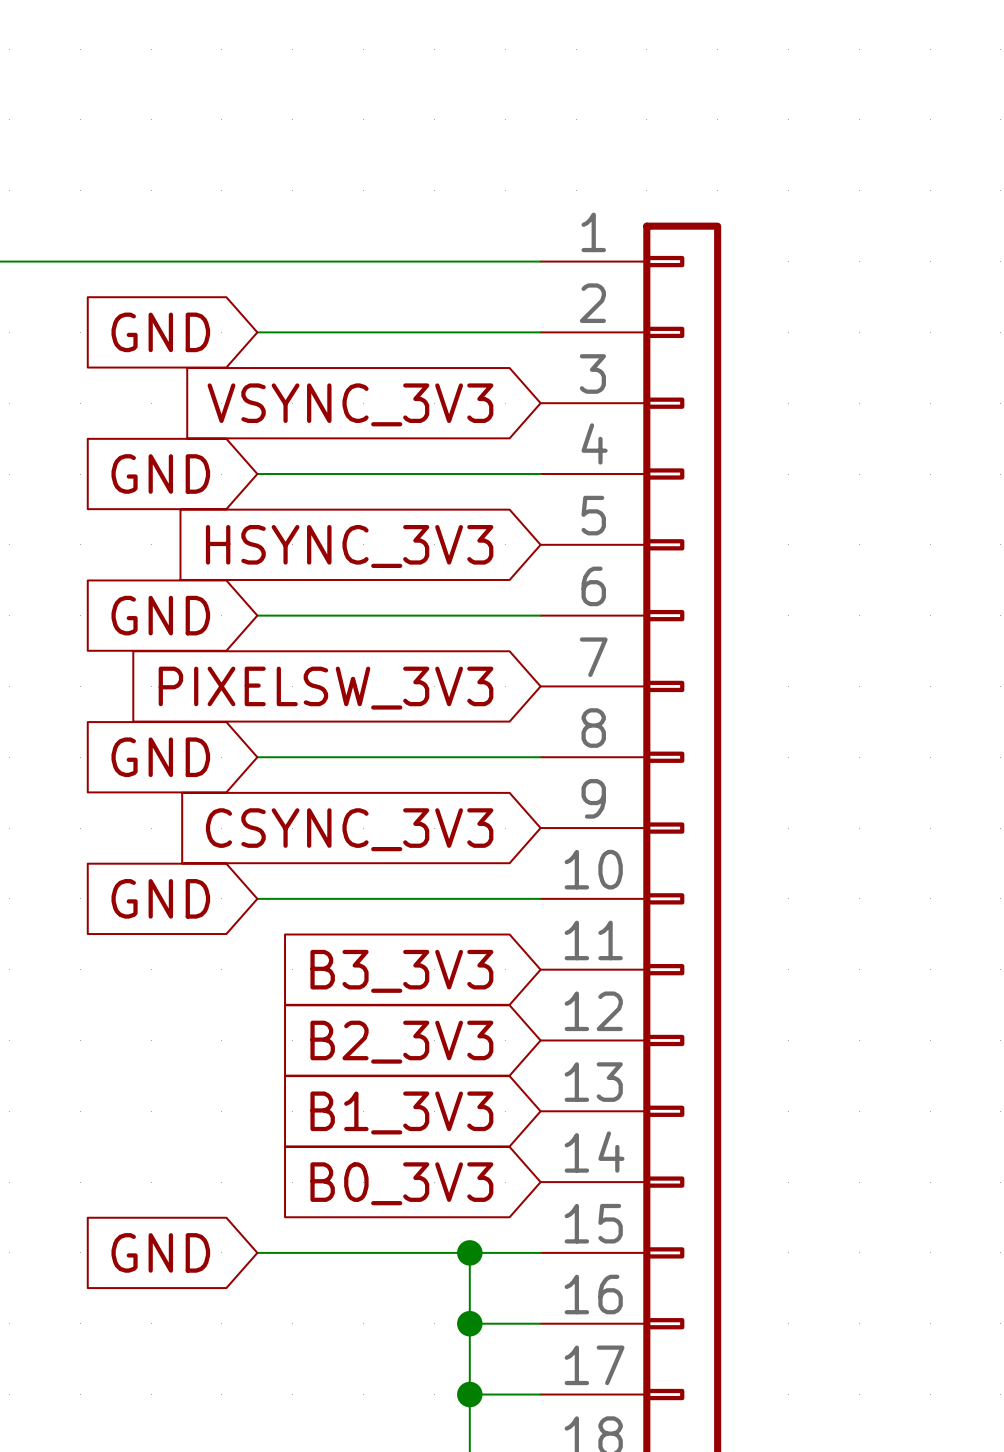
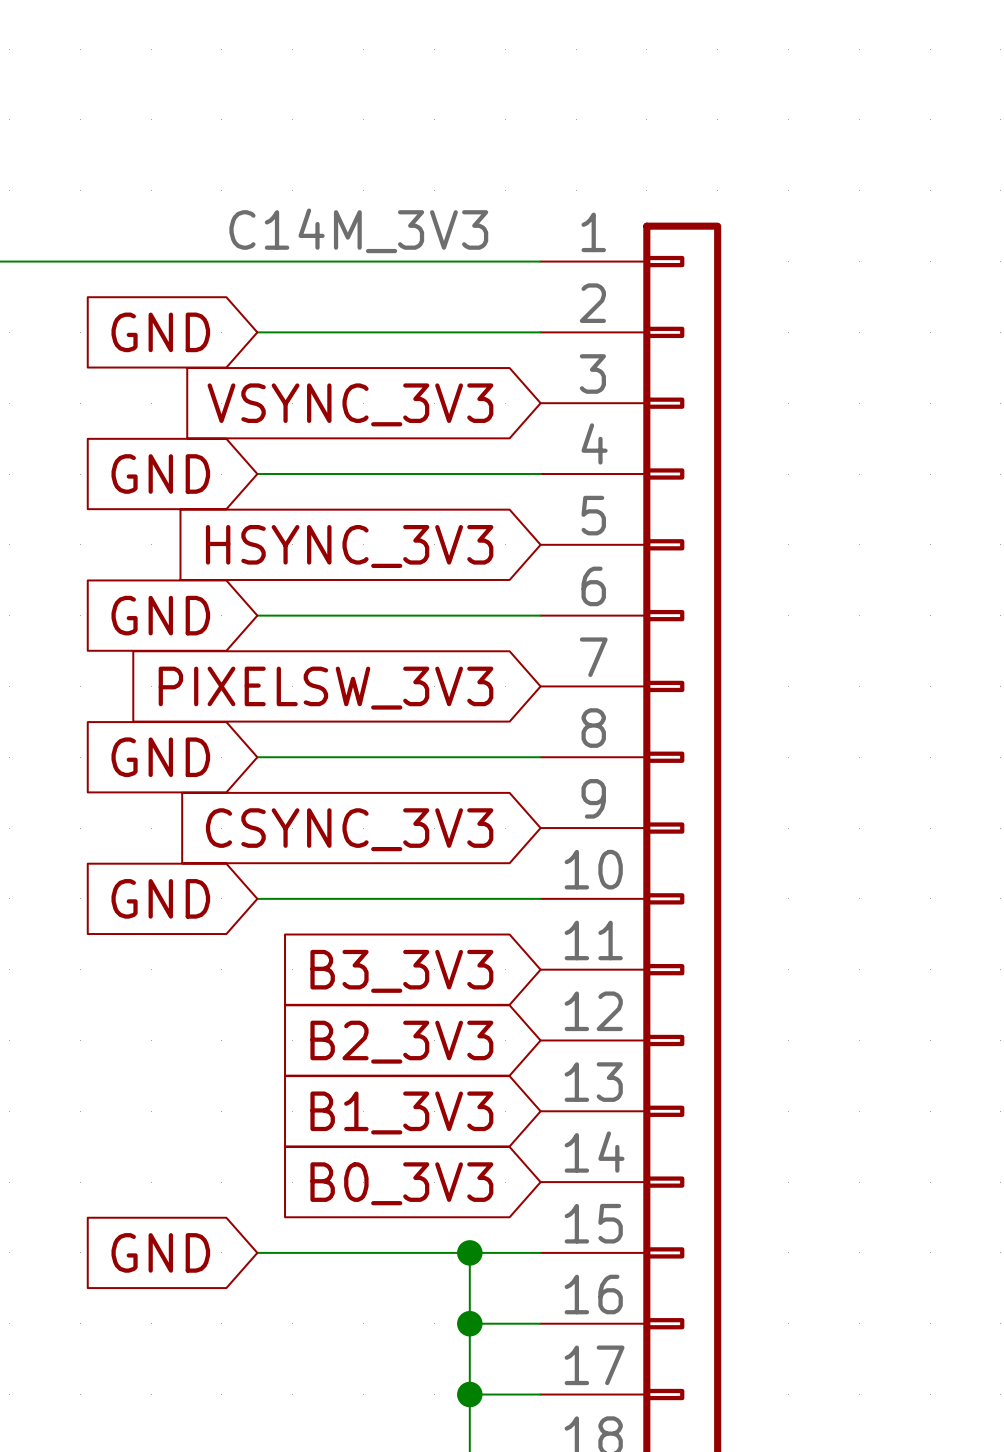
label: none -> C14M_3V3 (358, 230)

